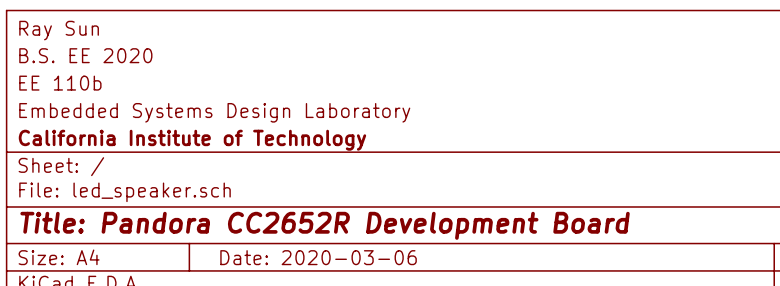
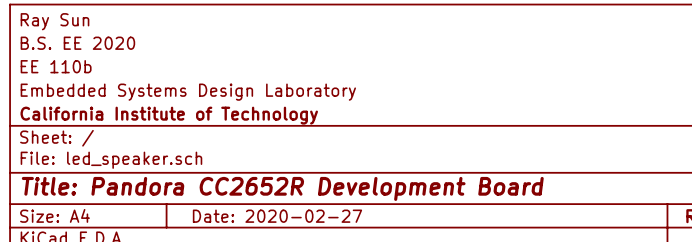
title block: Date: 2020-03-06 (318, 257) -> Date: 2020-02-27 (277, 216)

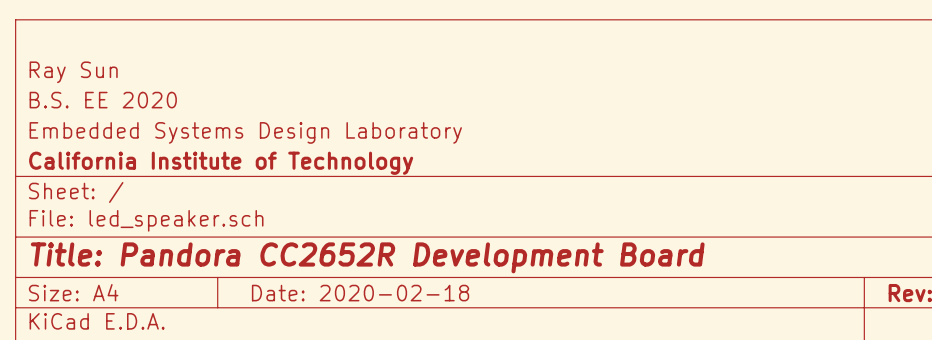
title block: Ray Sun (54, 21) -> none
title block: B.S. EE 2020 (77, 43) -> Ray Sun (73, 72)
title block: EE 110b (56, 66) -> B.S. EE 2020 (103, 100)
title block: Date: 2020-02-27 (277, 216) -> Date: 2020-02-18 (360, 293)

